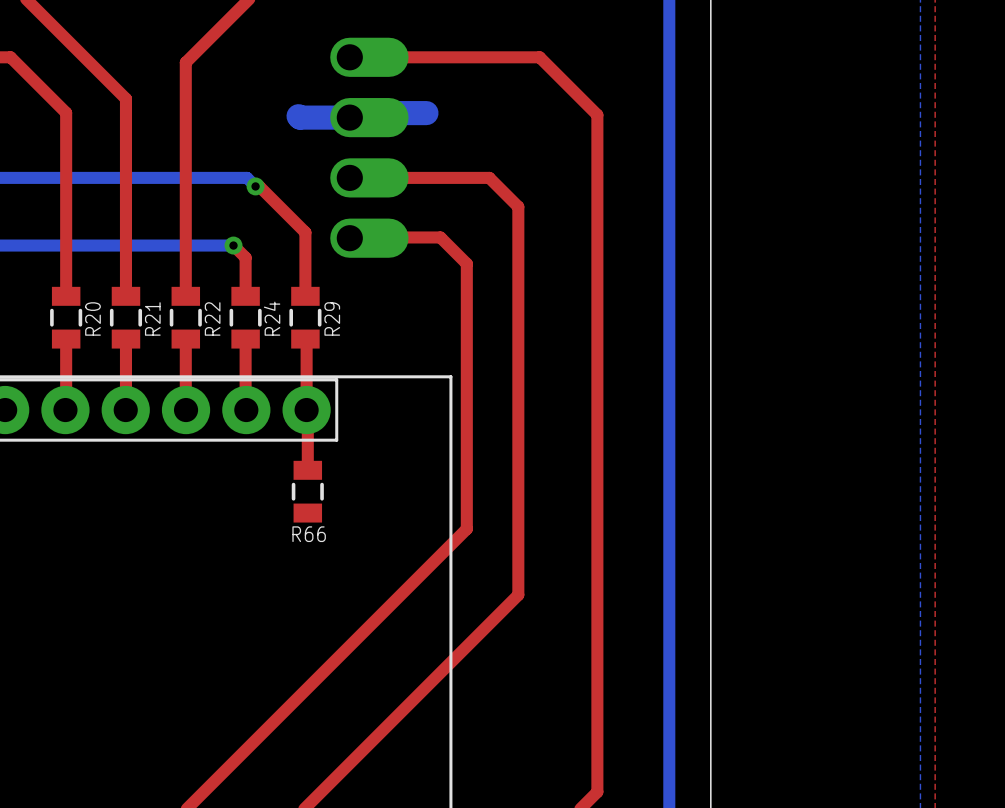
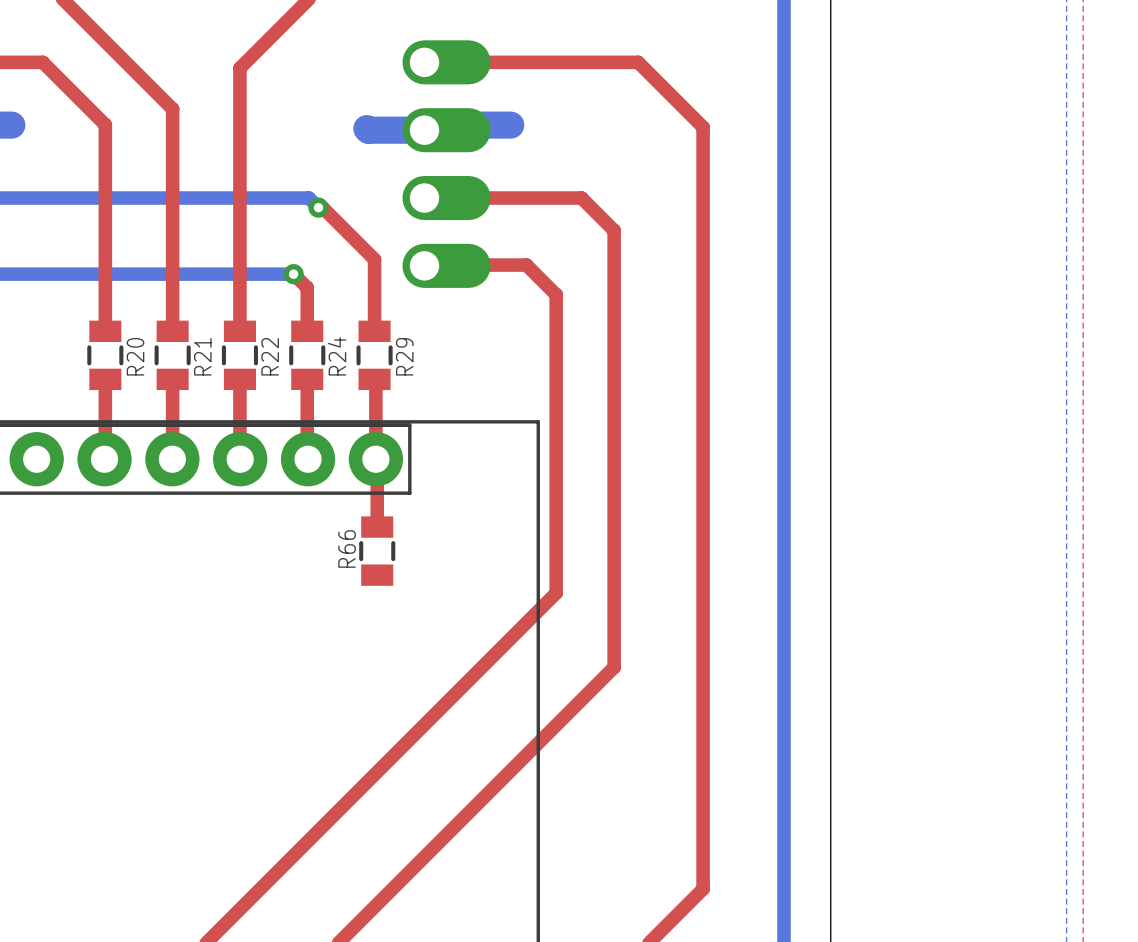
R66 name rotation: 0° (309, 534) -> 90° counterclockwise (347, 548)
R66 name position: R66 (309, 534) -> R66 (347, 548)

